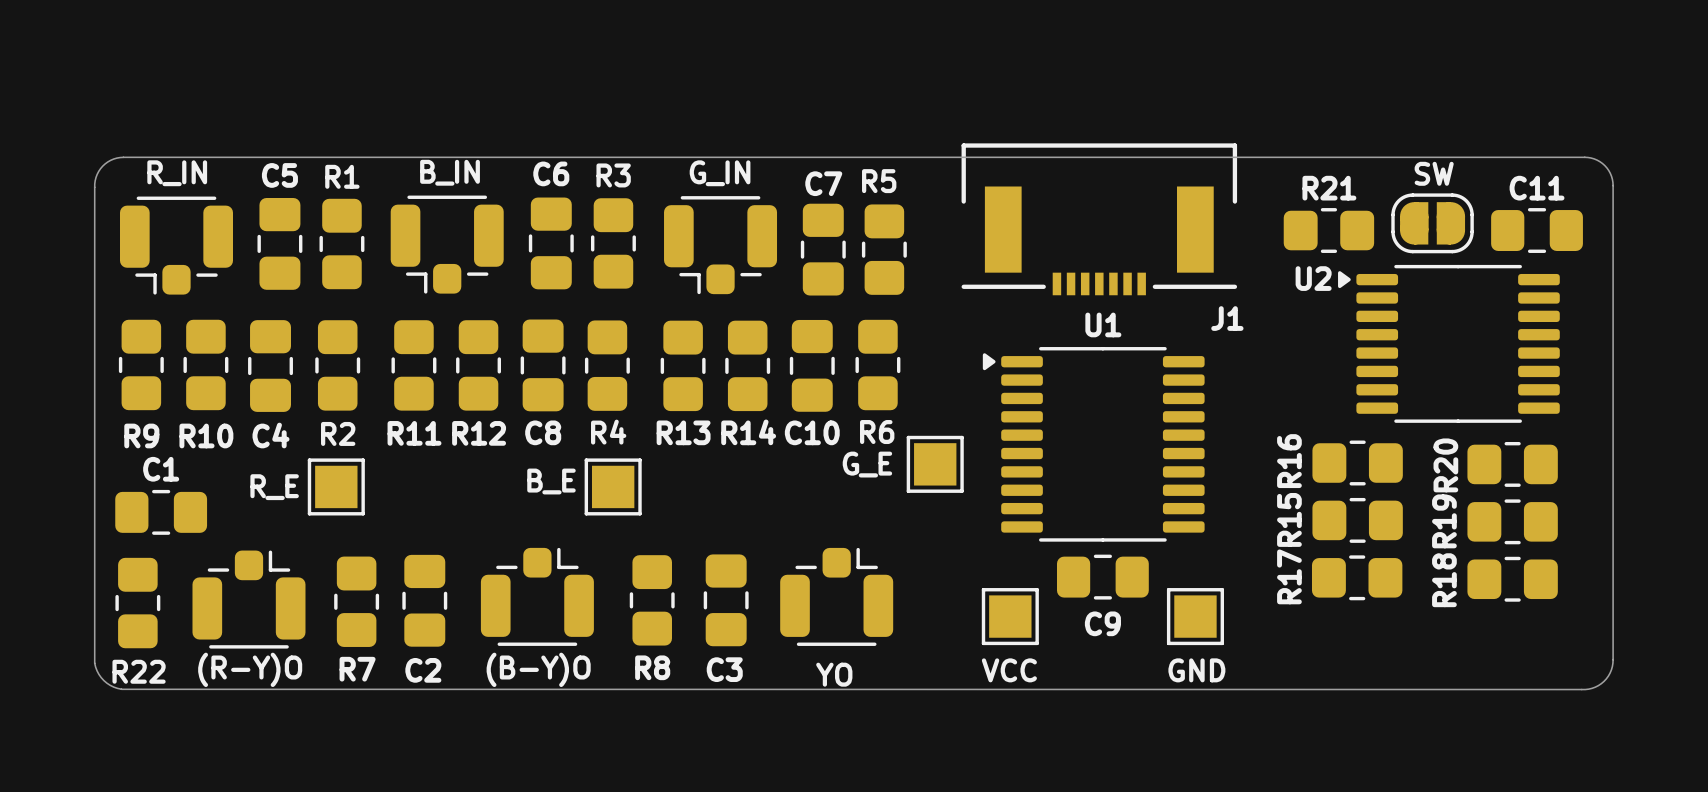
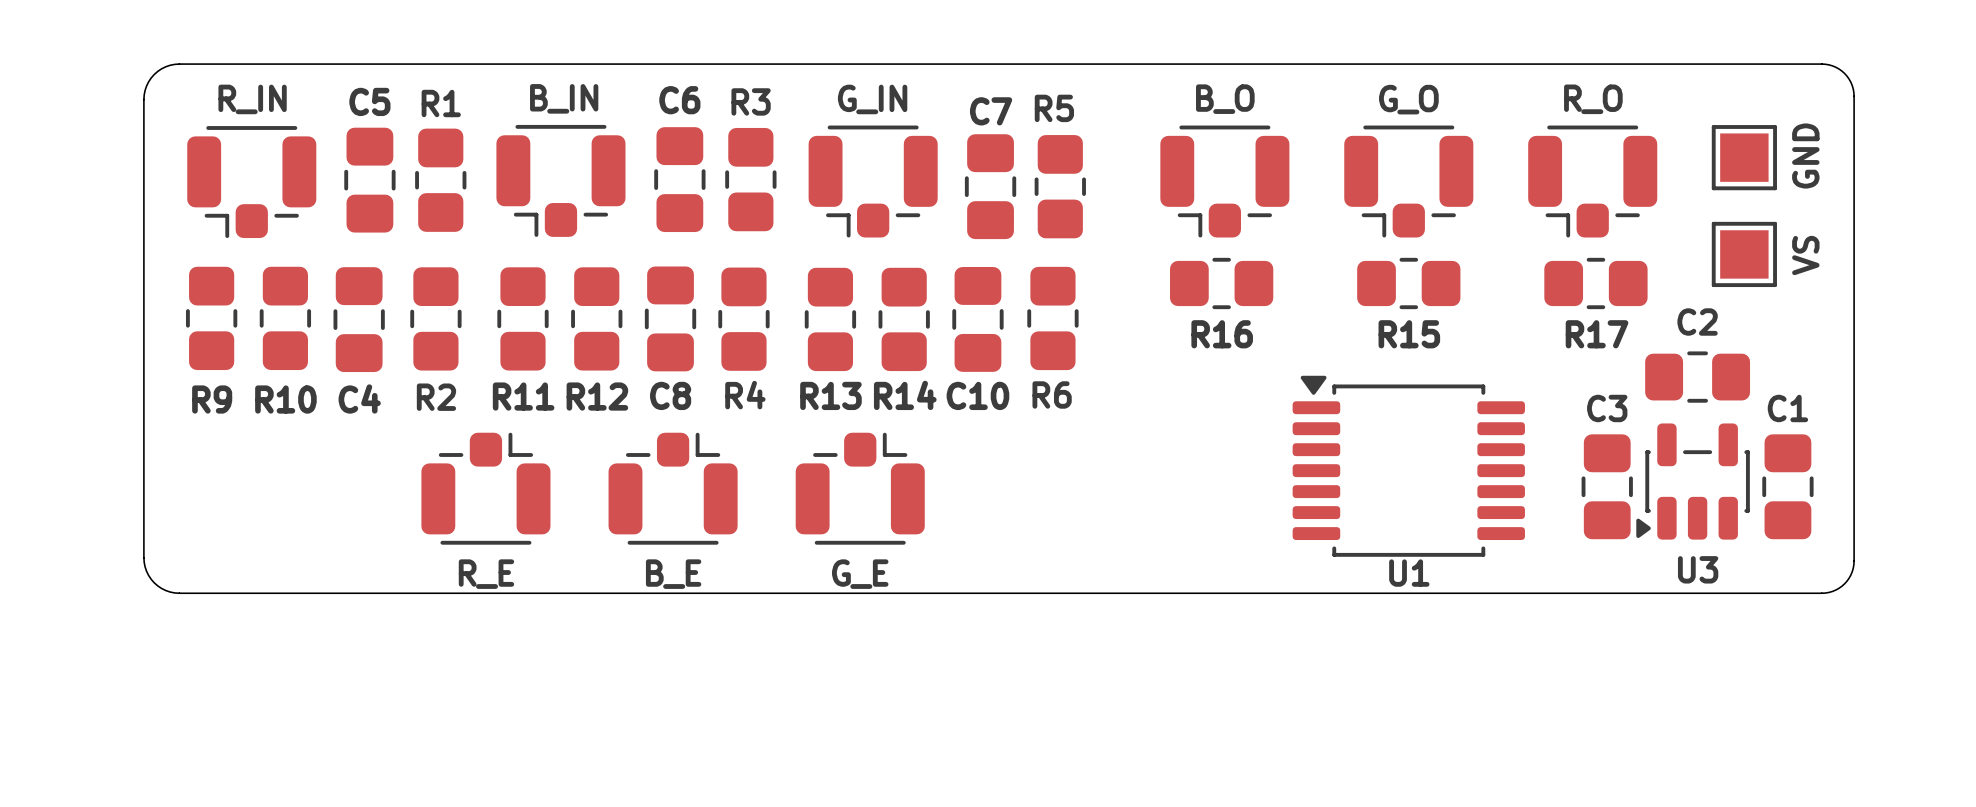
board edge: (123, 157) (1584, 157) (1594, 158) (1602, 163) (1608, 170) (1613, 185) (1613, 659) (1611, 669) (1601, 683) (1585, 689) (121, 689) (113, 687) (101, 677) (94, 663) (94, 183) (97, 174) (102, 166) (110, 160) (123, 157) -> (179, 64) (165, 66) (154, 74) (146, 85) (143, 99) (143, 557) (146, 571) (151, 579) (157, 585) (170, 592) (1821, 593) (1832, 591) (1841, 586) (1852, 571) (1854, 560) (1854, 96) (1849, 79) (1841, 71) (1832, 65) (1821, 64) (179, 64)
J1: (1099, 219) -> none
part: SW (1432, 223) -> none
R21: (1328, 230) -> none
C11: (1537, 230) -> none
part: none -> B_O (1224, 181)
part: none -> G_O (1408, 181)
part: none -> R_O (1592, 181)
part: none -> VS (1744, 254)
U1 name position: U1 (1103, 324) -> U1 (1409, 573)
U2: (1448, 343) -> none
U1 footprint: [982, 347, 1205, 542] -> [1292, 375, 1525, 557]
R16 name rotation: 0° (1289, 461) -> 90° clockwise (1222, 334)
R16 name position: R16 (1289, 461) -> R16 (1222, 334)
R16 position: (1357, 463) -> (1221, 283)
part: G_E (935, 464) -> none
R20: (1512, 464) -> none
part: R_E (336, 486) -> none
part: B_E (613, 486) -> none
U3: none -> (1693, 481)
C1 rotation: 0° (161, 512) -> 90° clockwise (1787, 486)
C1 position: (161, 512) -> (1787, 486)
part: none -> R_E (485, 488)
part: none -> B_E (673, 488)
part: none -> G_E (860, 488)
R15 name rotation: 0° (1289, 519) -> 90° clockwise (1409, 334)
R15 name position: R15 (1289, 519) -> R15 (1409, 334)
R15 position: (1357, 520) -> (1408, 283)
R19: (1512, 521) -> none
R17 name rotation: 0° (1289, 576) -> 90° clockwise (1597, 334)
R17 name position: R17 (1289, 576) -> R17 (1597, 334)
C9: (1102, 577) -> none
R17 position: (1357, 577) -> (1595, 283)
R18: (1512, 579) -> none
part: (B-Y)O (537, 596) -> none
part: YO (836, 596) -> none
part: (R-Y)O (248, 599) -> none
C2 rotation: 0° (424, 600) -> 90° clockwise (1697, 377)
C2 position: (424, 600) -> (1697, 377)
R8: (652, 600) -> none
C3 position: (726, 600) -> (1607, 486)
R7: (356, 601) -> none
R22: (137, 603) -> none
part: VCC (1010, 616) -> none
part position: (1195, 616) -> (1744, 157)
C3 name position: C3 (724, 669) -> C3 (1607, 408)
C2 name position: C2 (423, 670) -> C2 (1697, 322)
part value rotation: 0° (1196, 670) -> 90° counterclockwise (1805, 156)
part value position: GND (1196, 670) -> GND (1805, 156)

